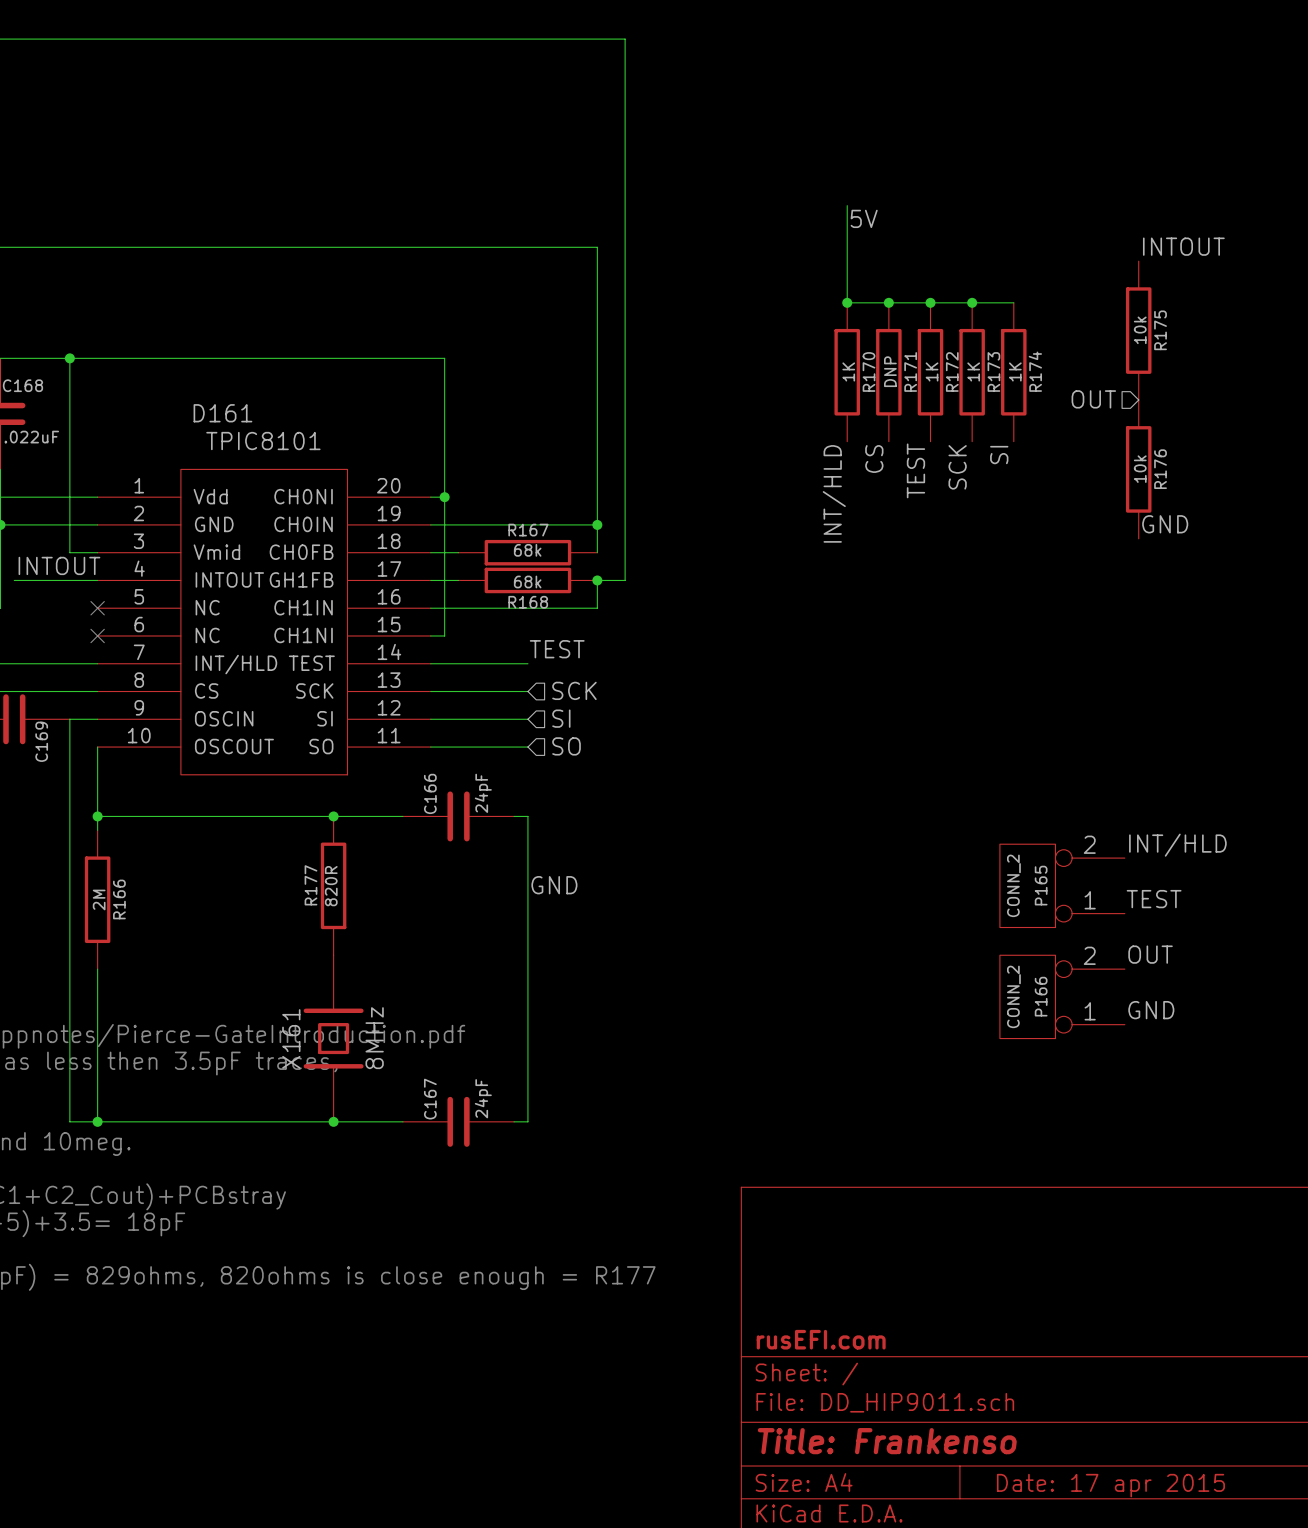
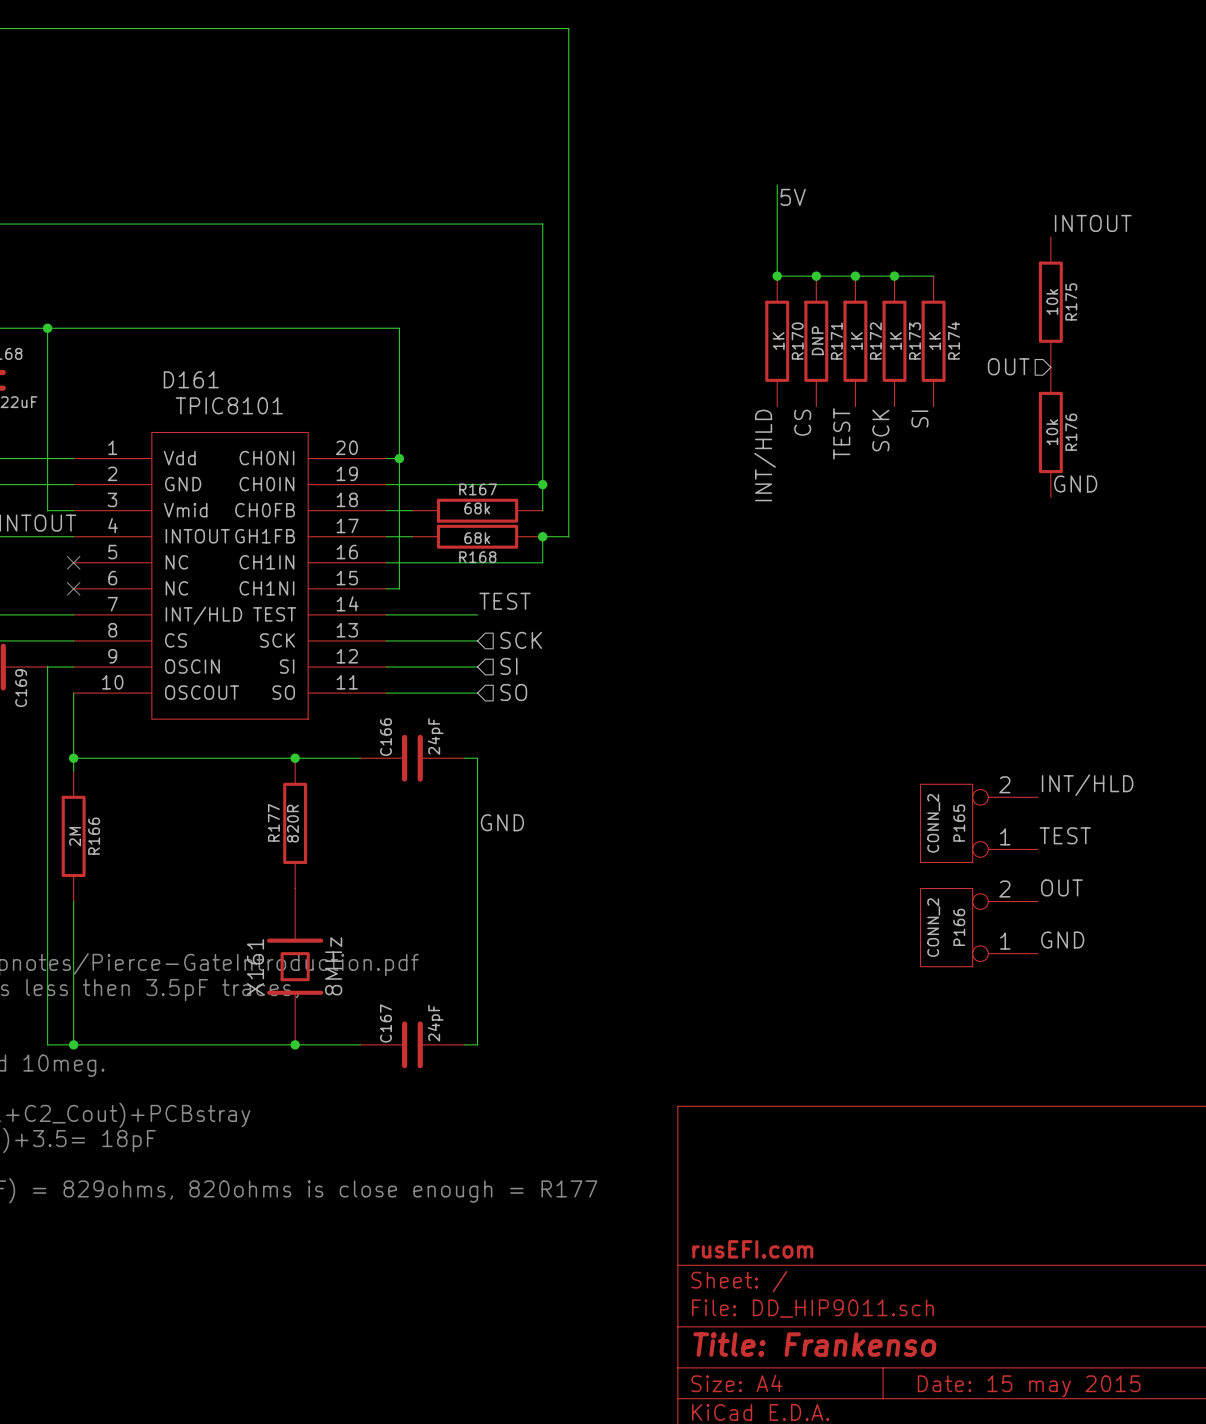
title block: Date: 17 apr 2015 (1110, 1485) -> Date: 15 may 2015 (1029, 1386)

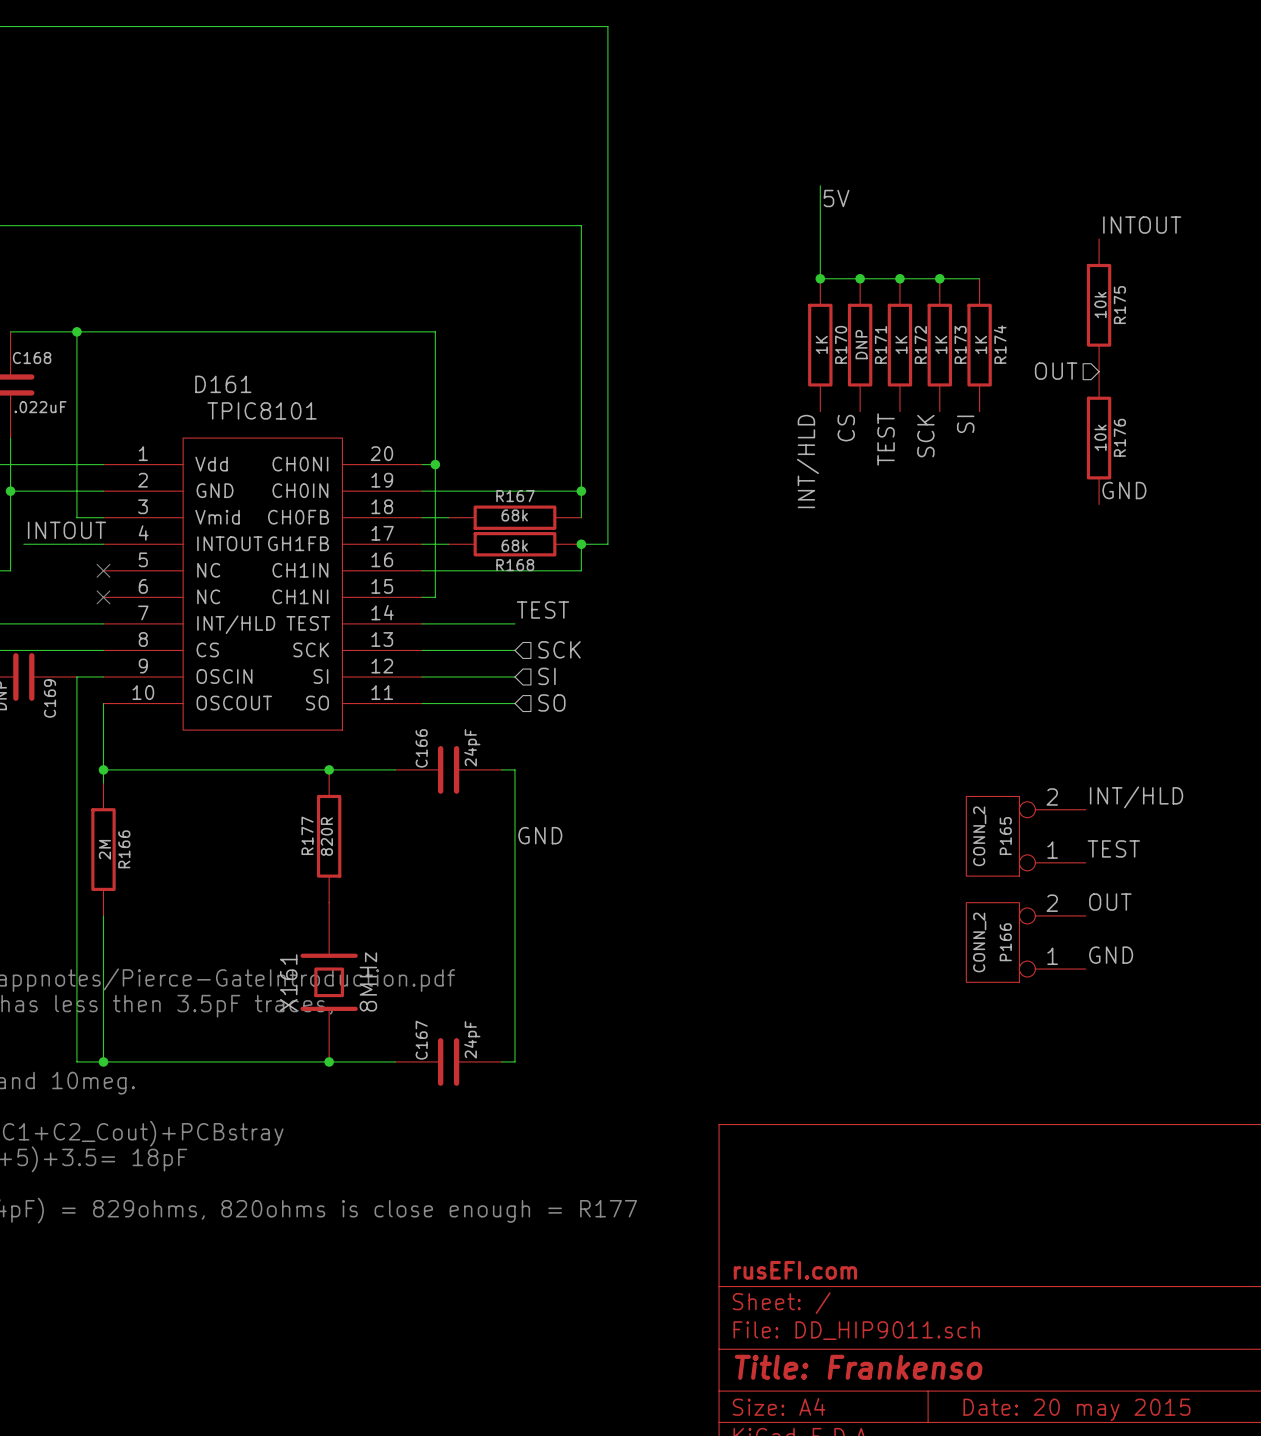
title block: Date: 15 may 2015 (1029, 1386) -> Date: 20 may 2015 (1076, 1409)

